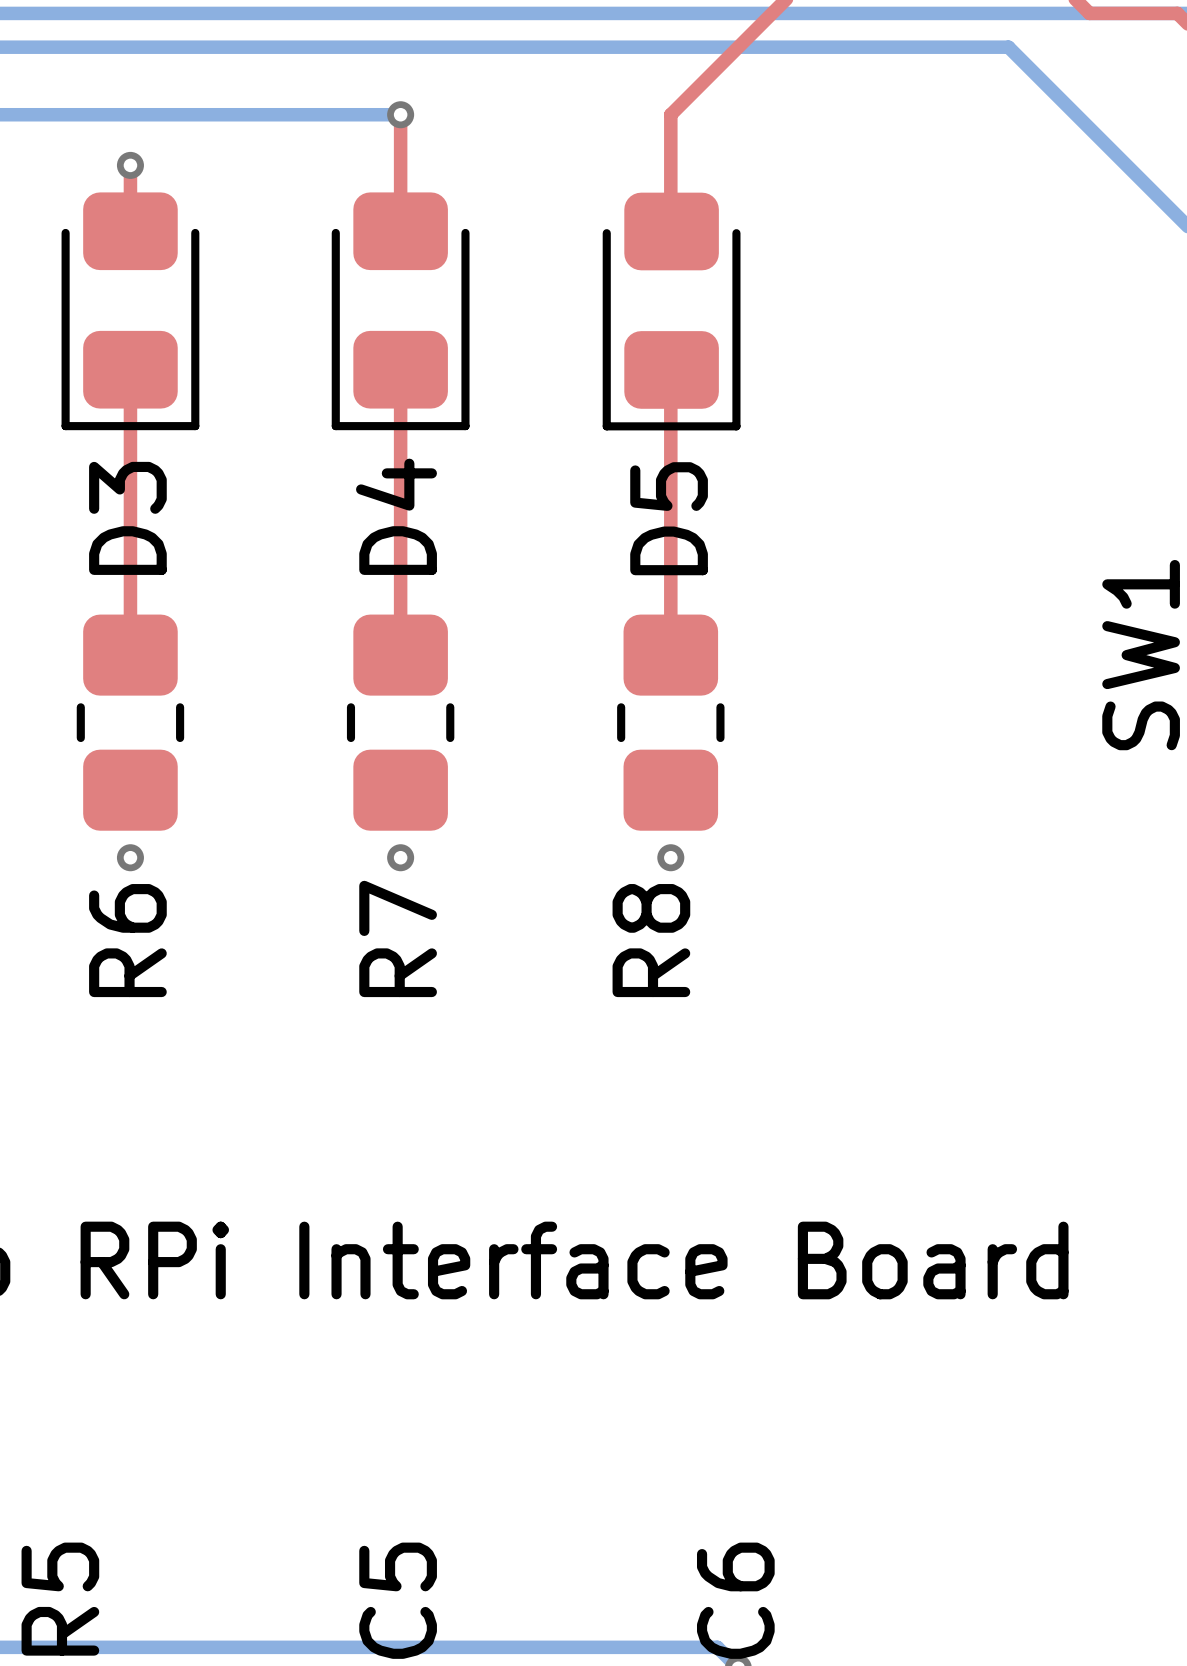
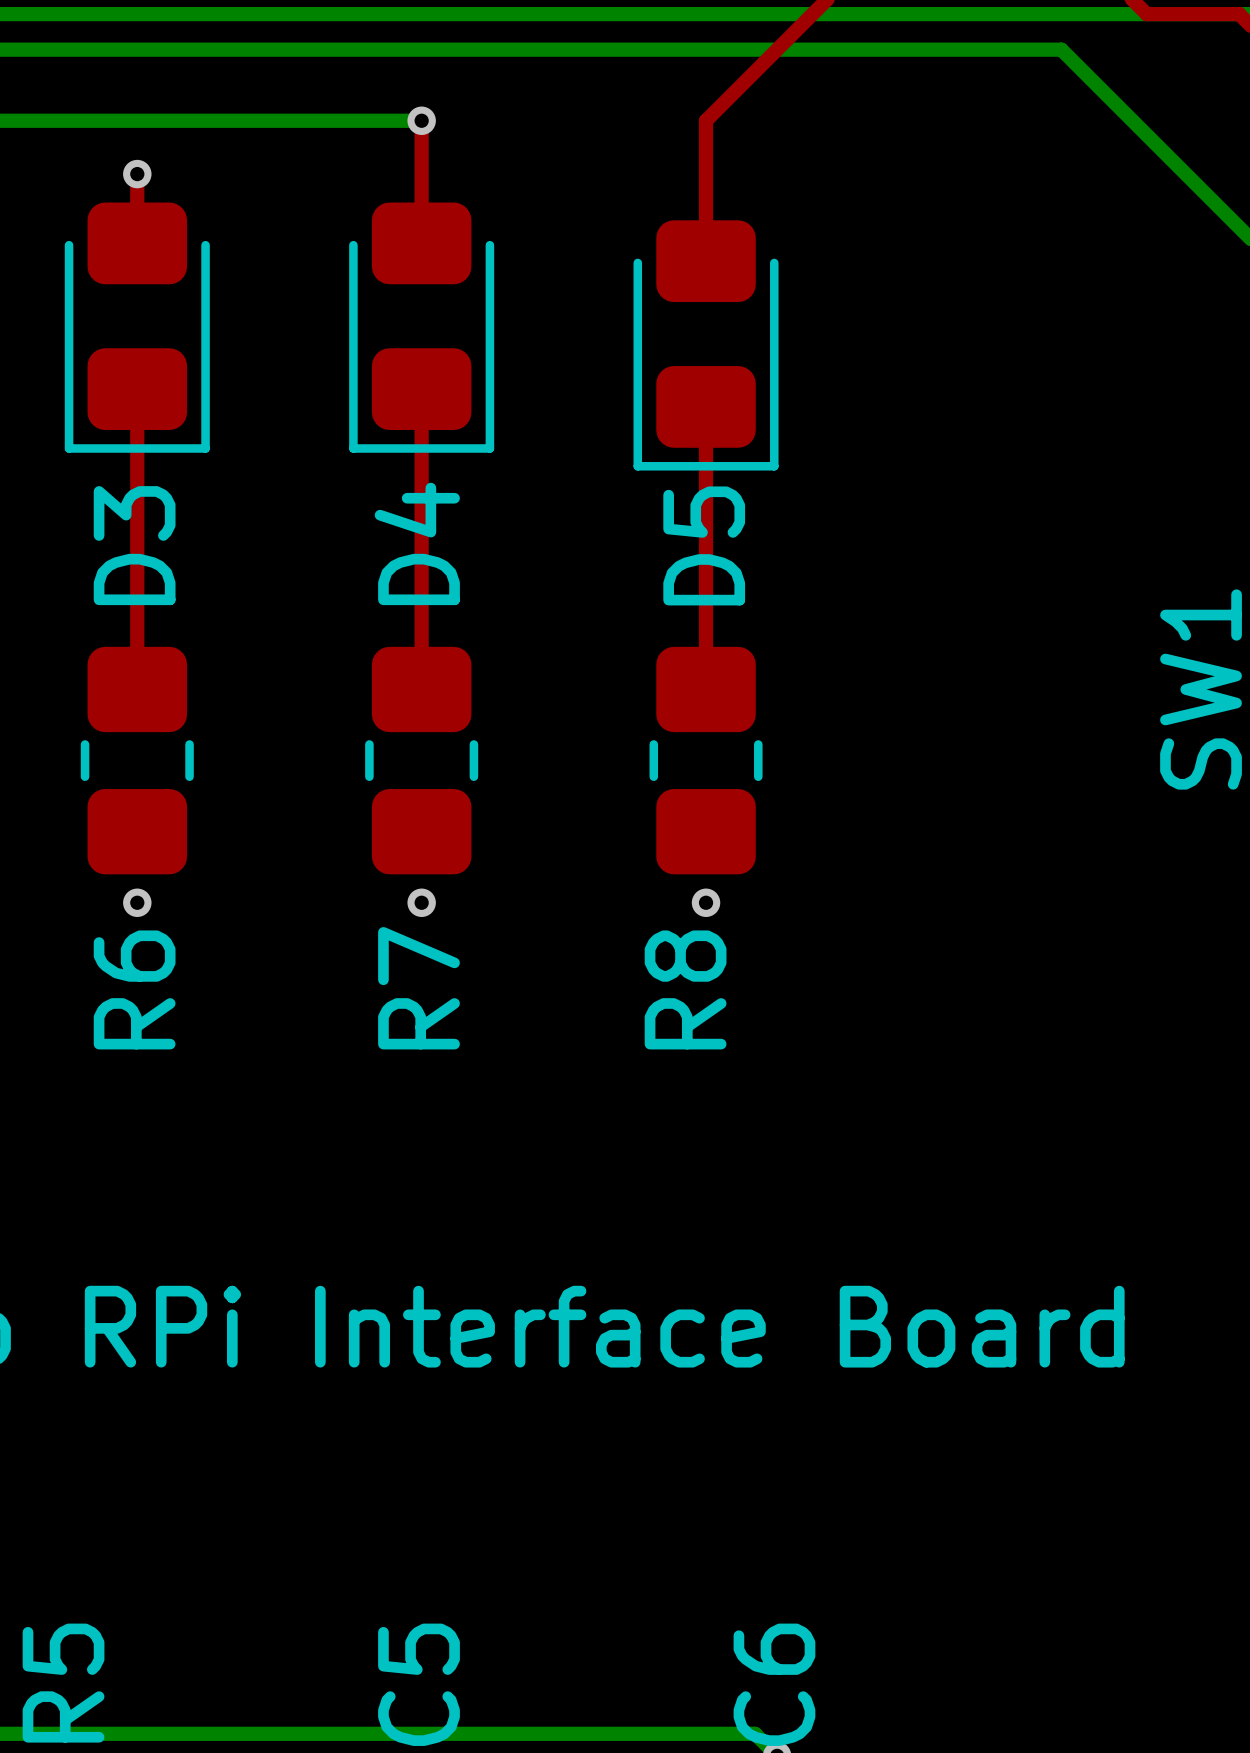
D5 position: (671, 311) -> (706, 345)

